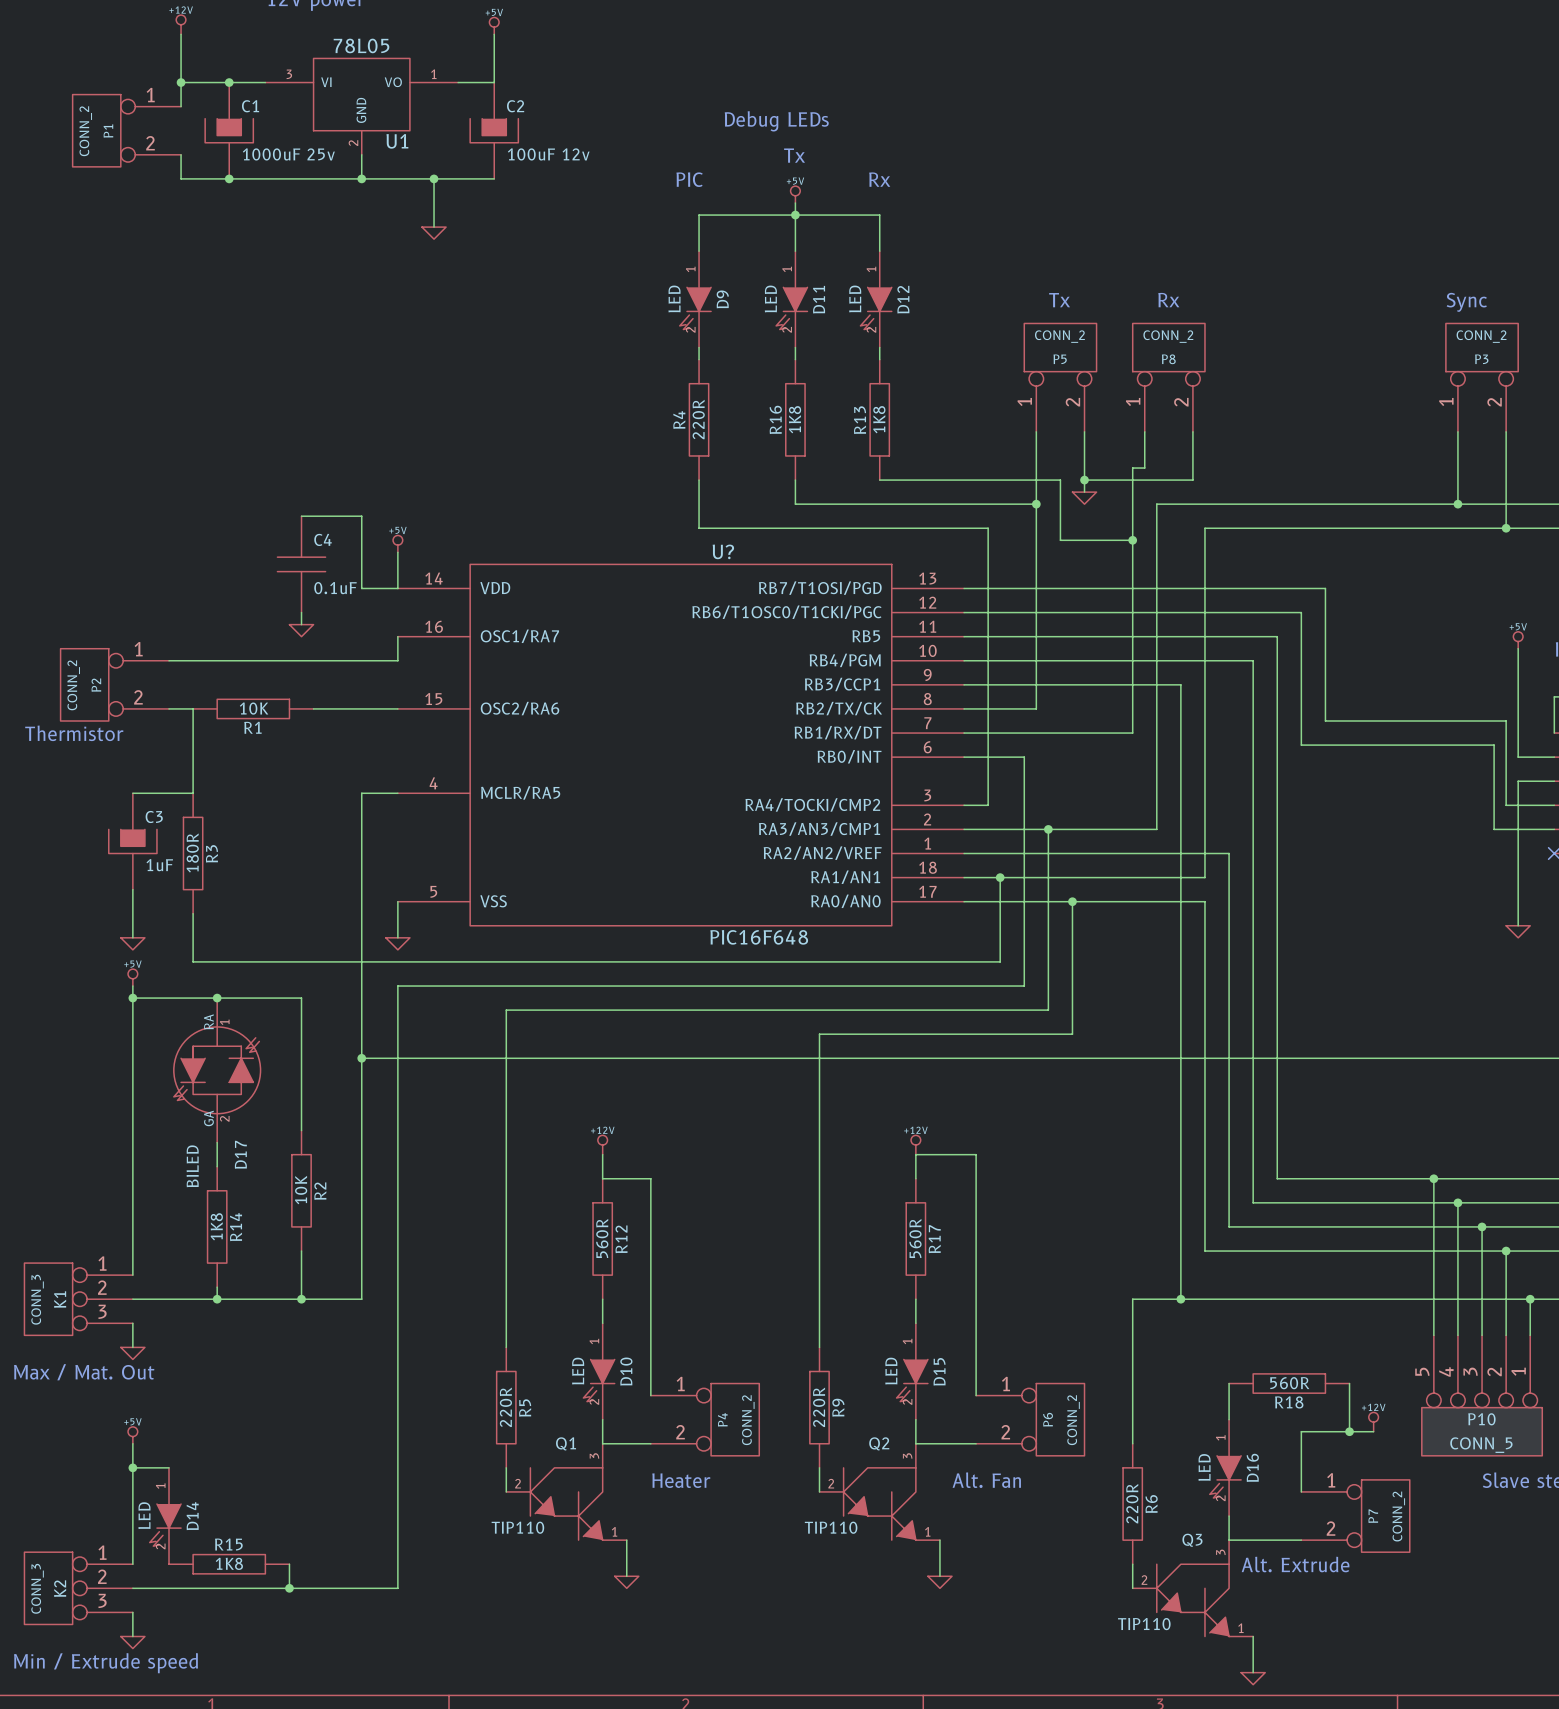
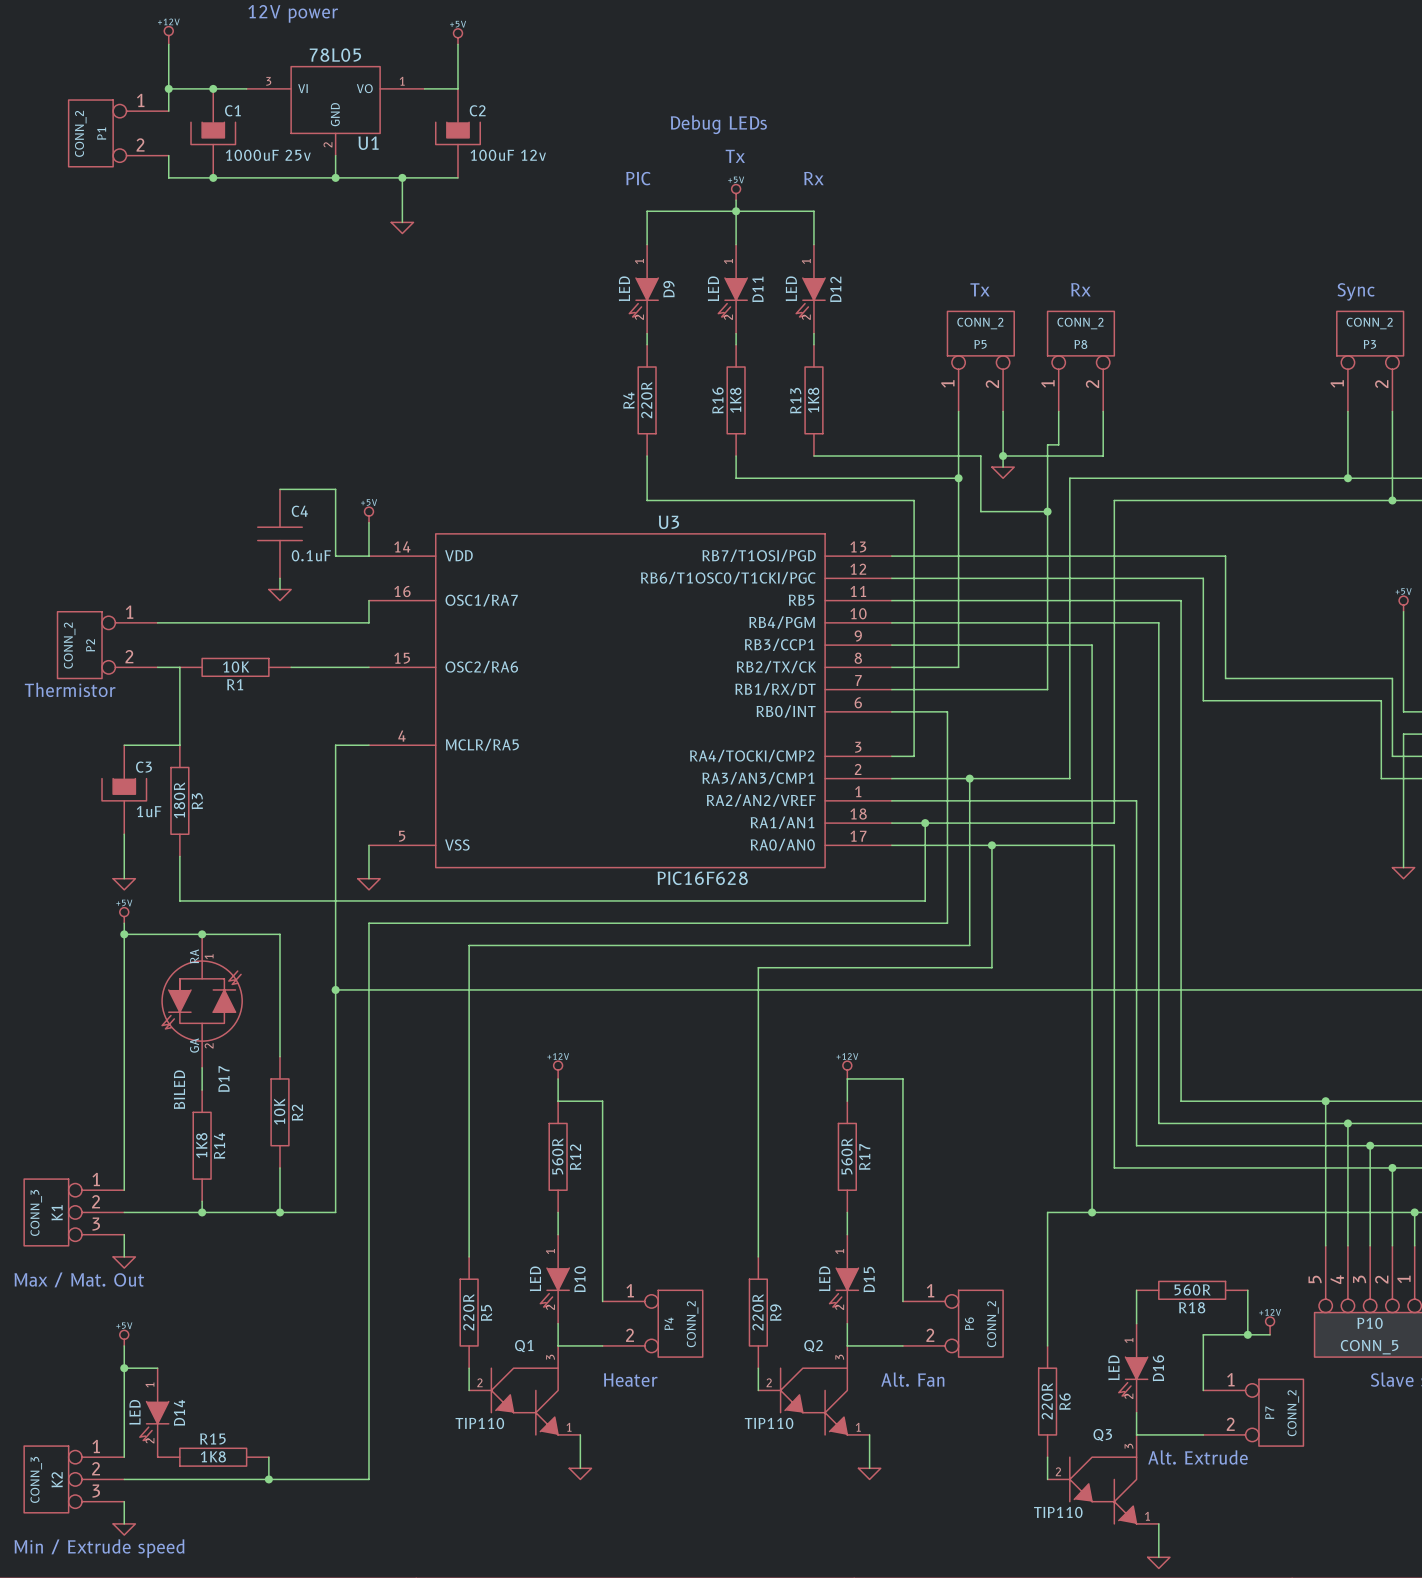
U? name: U? (723, 551) -> U3 (668, 522)
U? value: PIC16F648 (759, 937) -> PIC16F628 (702, 878)

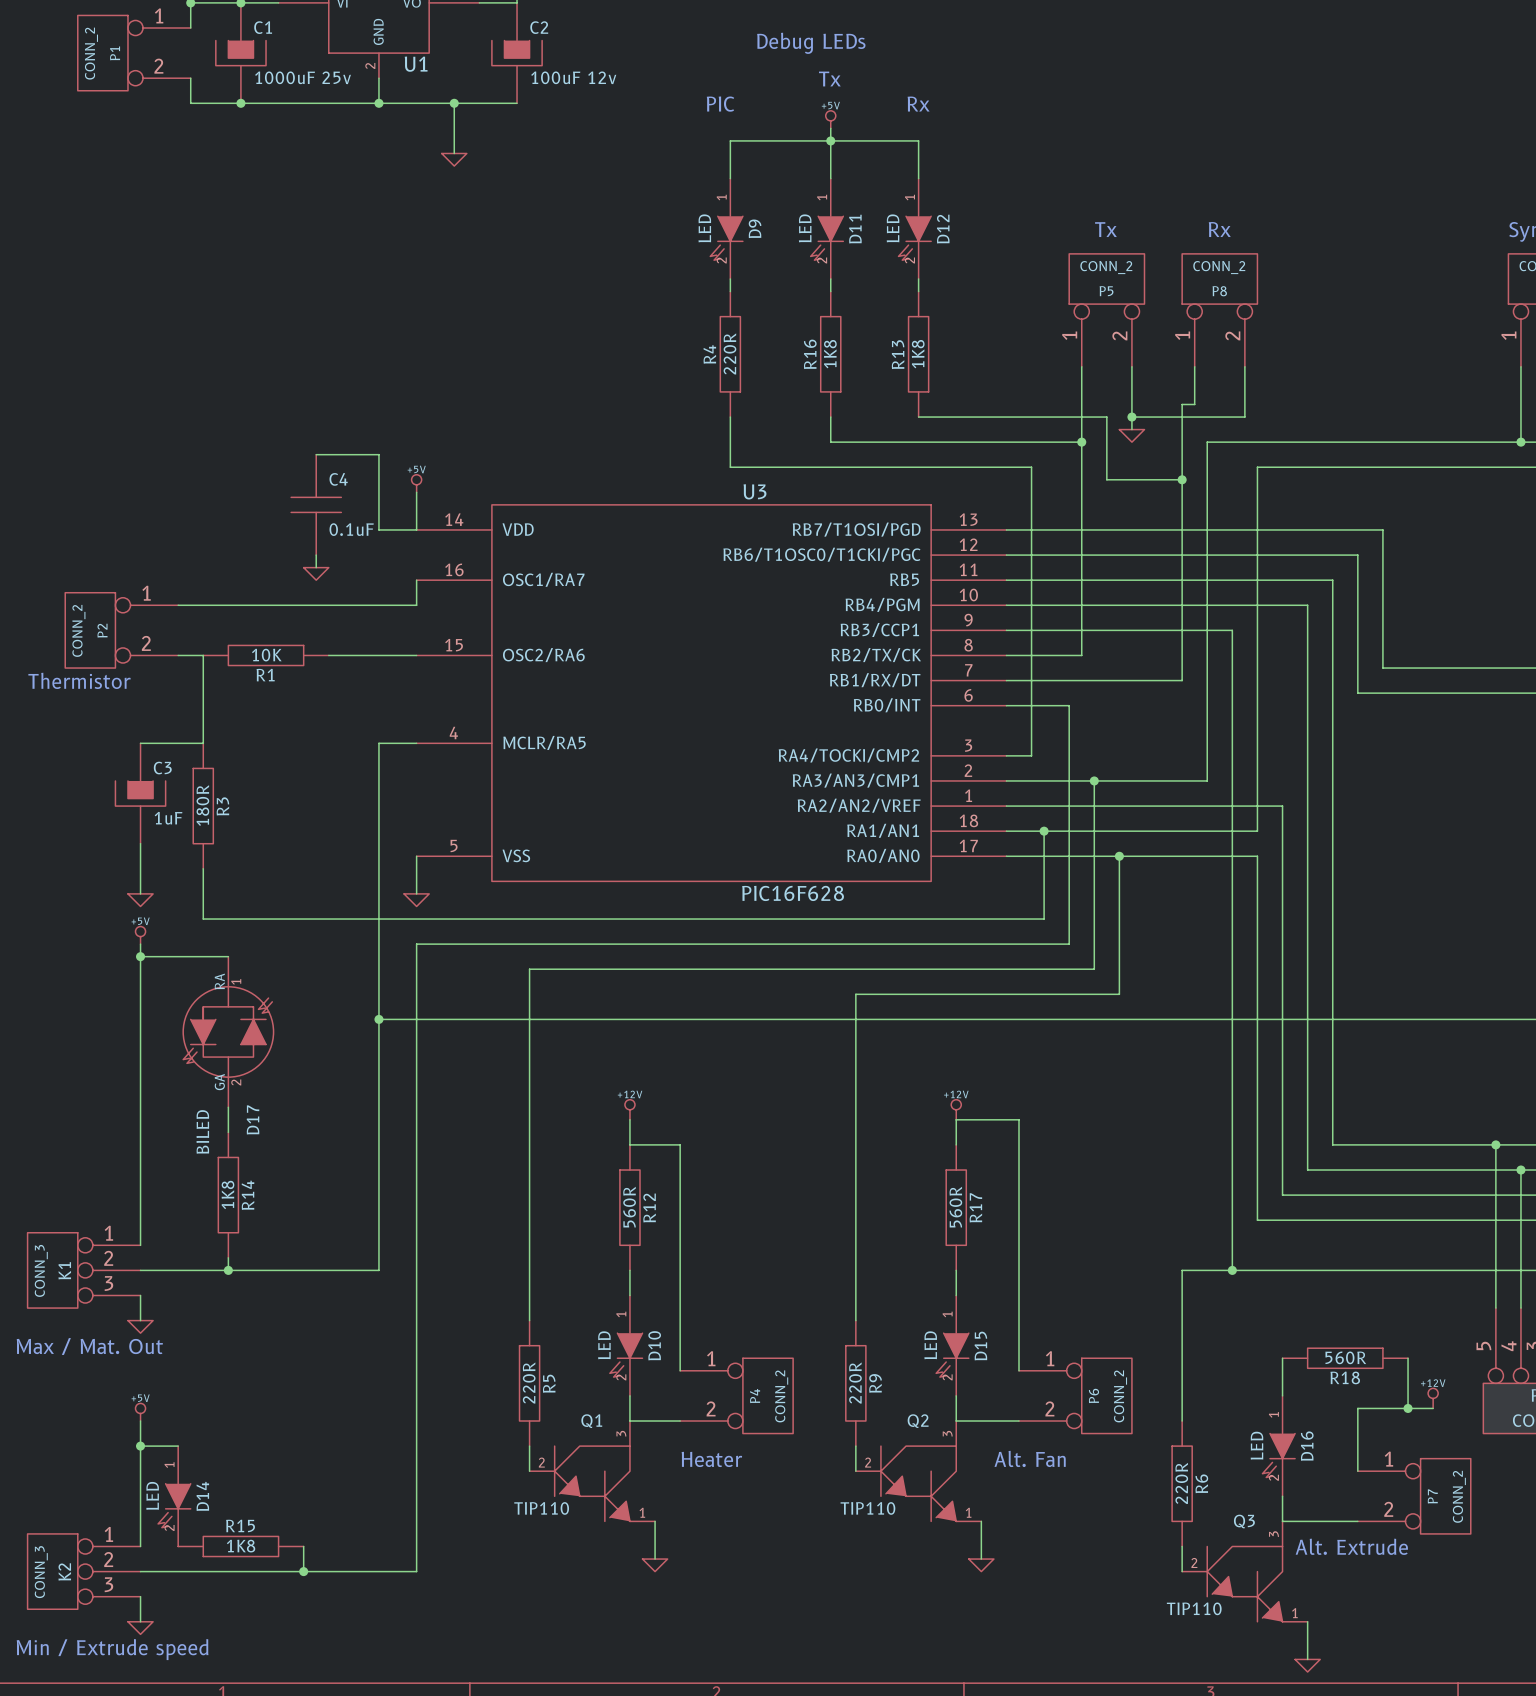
wire: (202, 934) (280, 934) (280, 1056) -> none
junction: (202, 934) -> none
R2: 10K (280, 1112) -> none
wire: (280, 1167) (280, 1212) -> none
junction: (280, 1212) -> none

